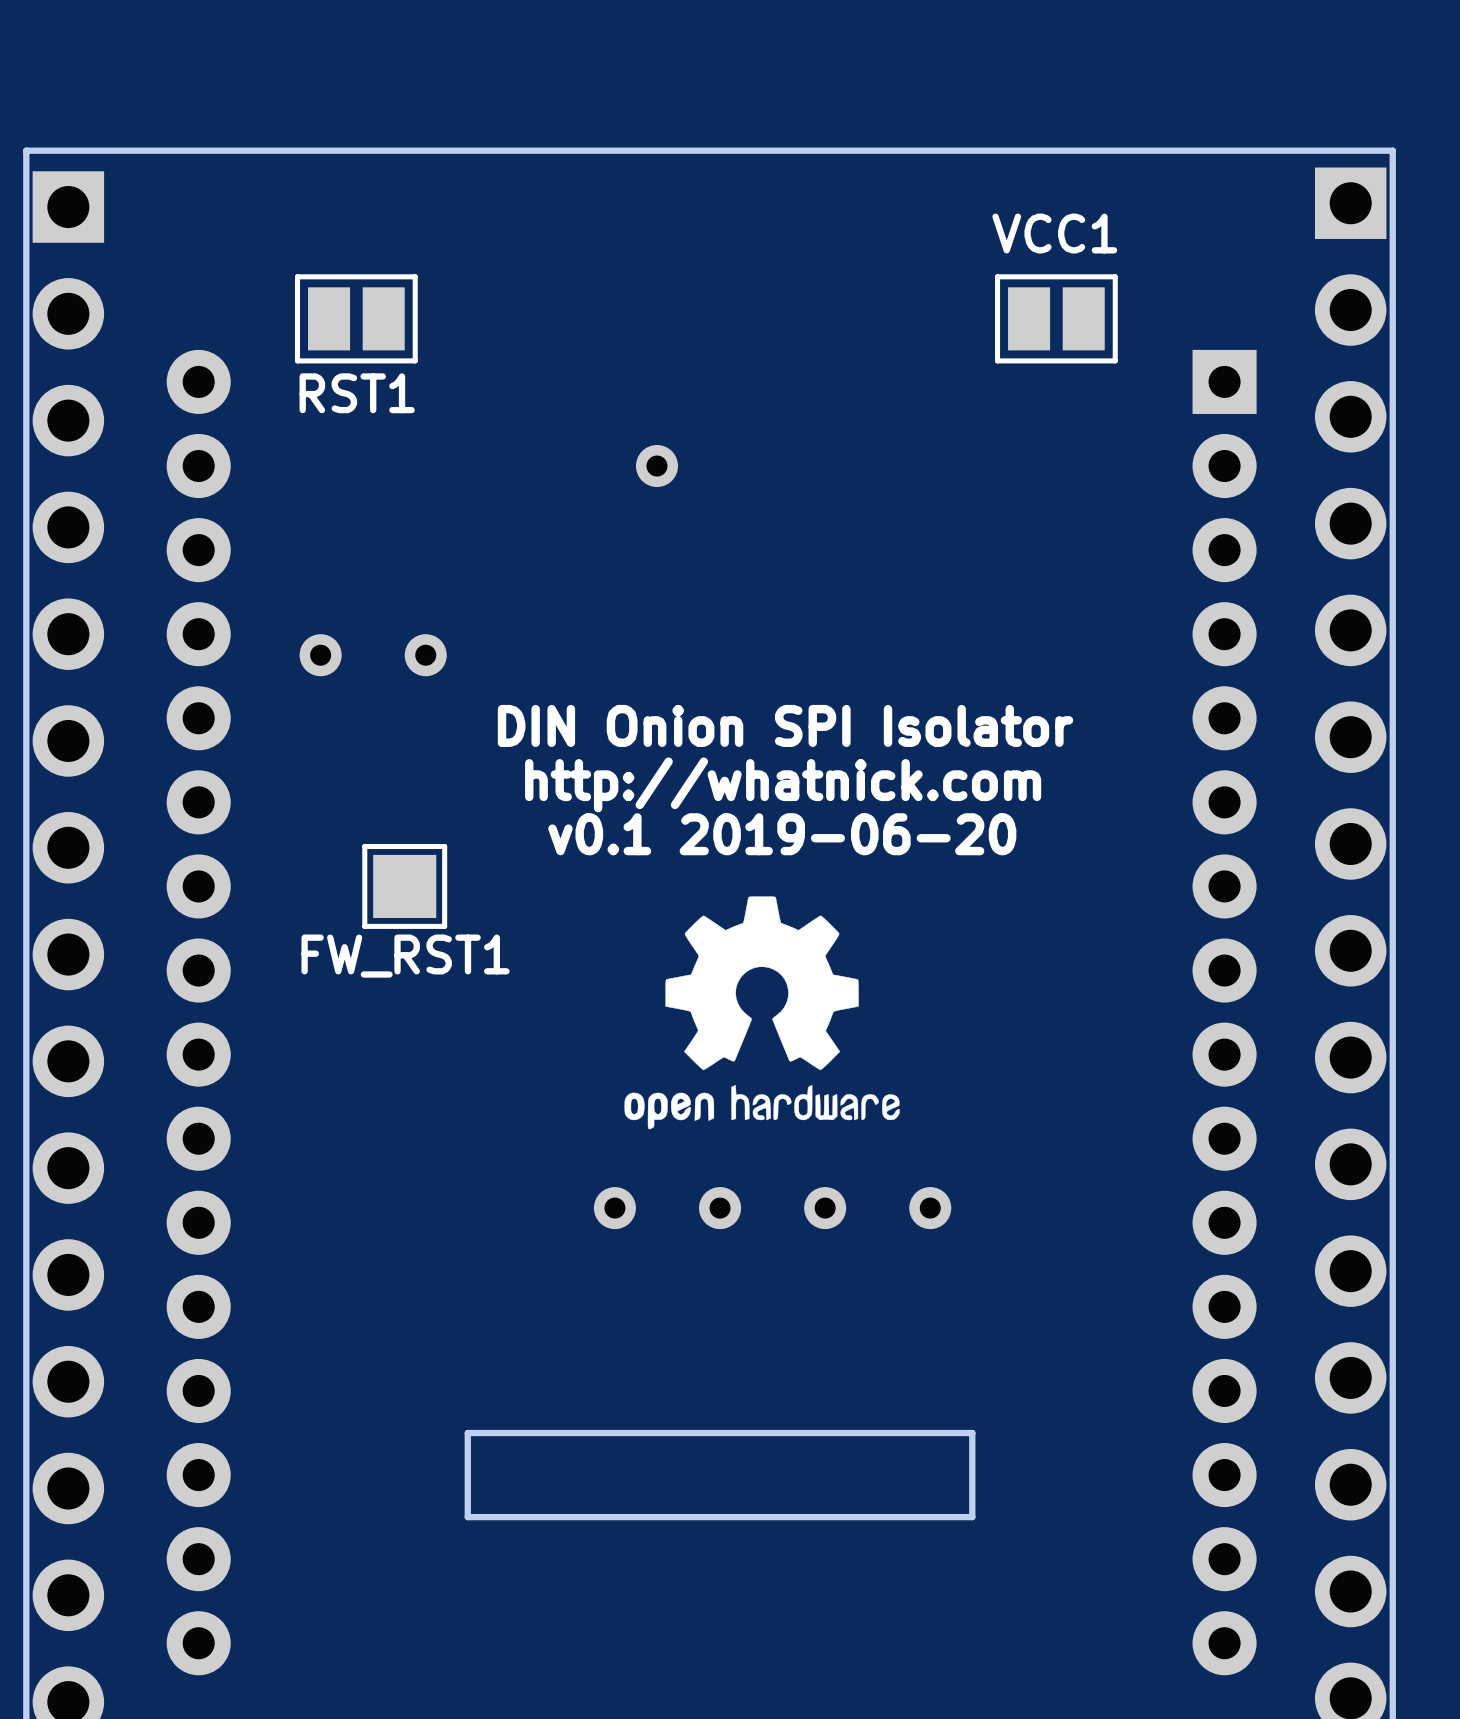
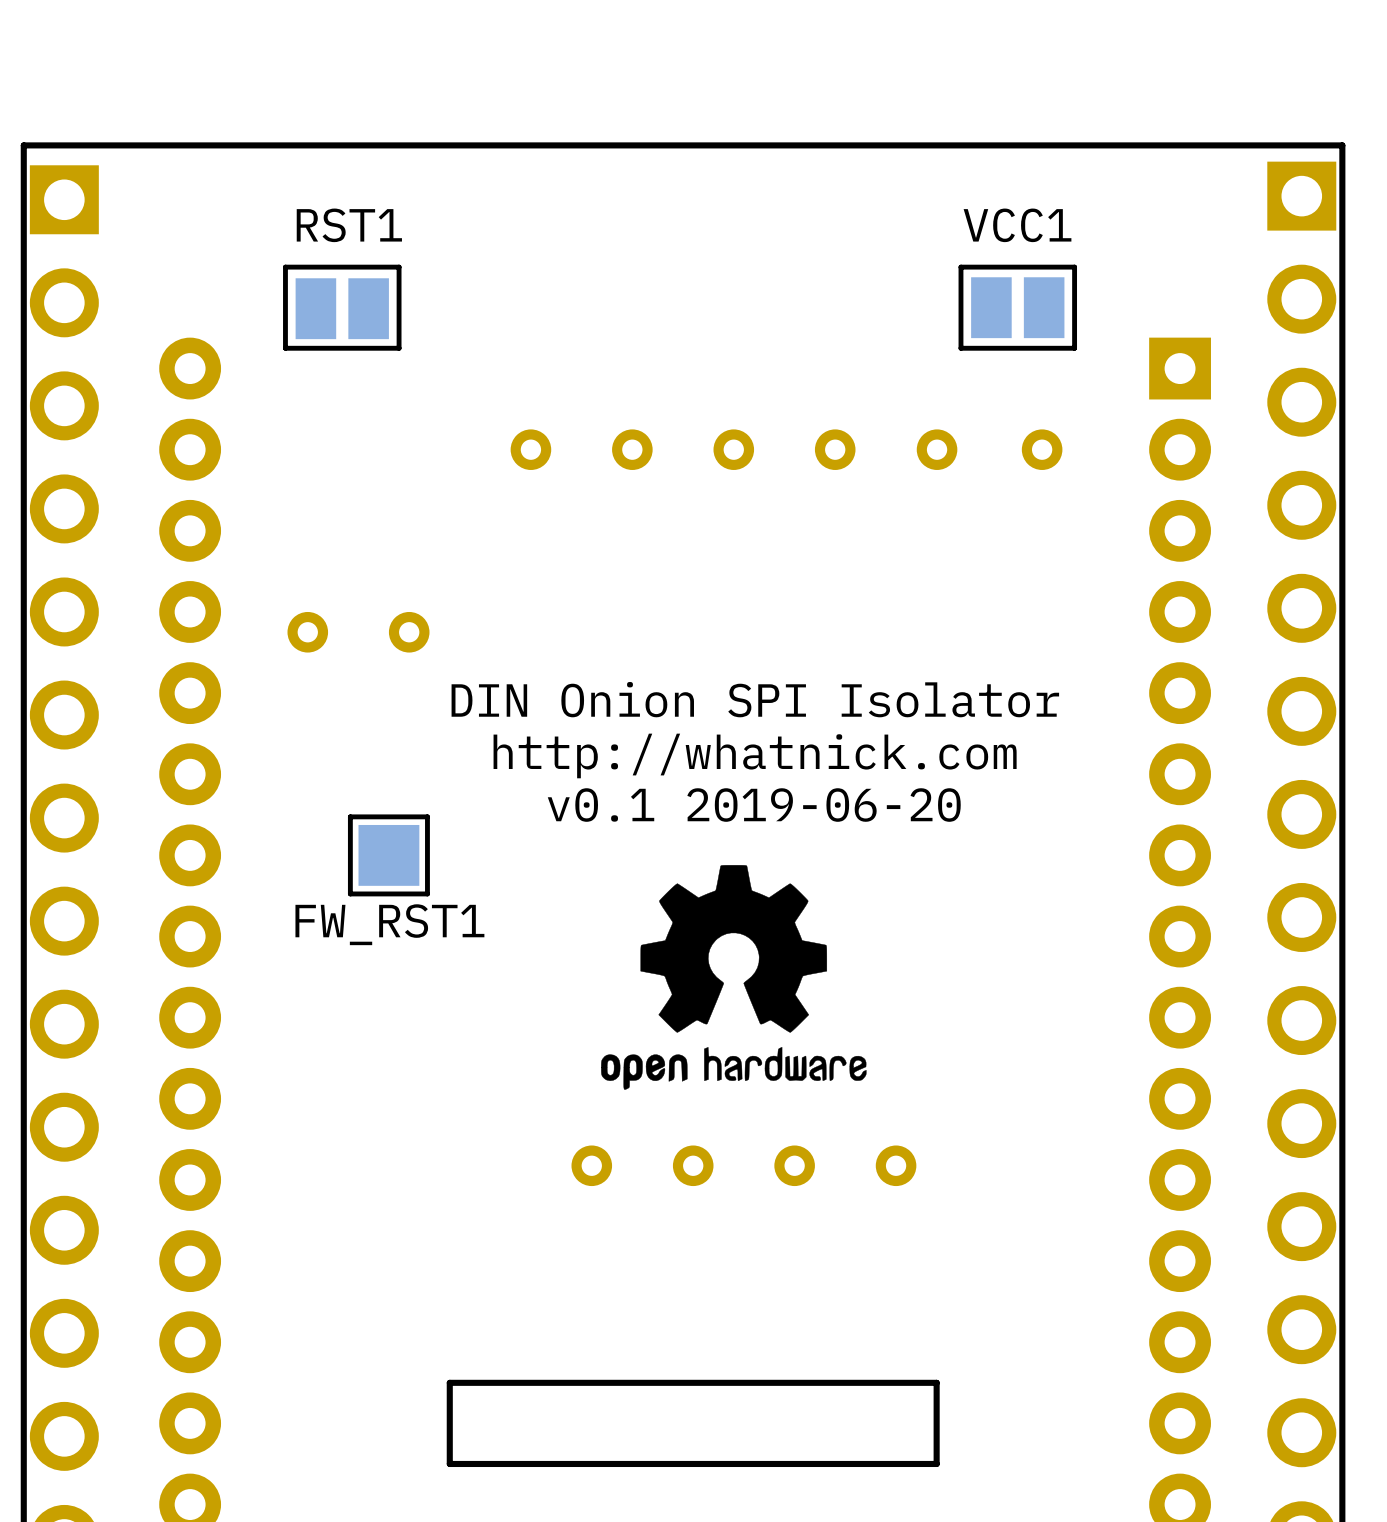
RST1 name position: RST1 (357, 393) -> RST1 (349, 225)
part: none -> (530, 449)
part: none -> (733, 449)
part: none -> (835, 449)
part: none -> (937, 449)
part: none -> (1042, 449)

